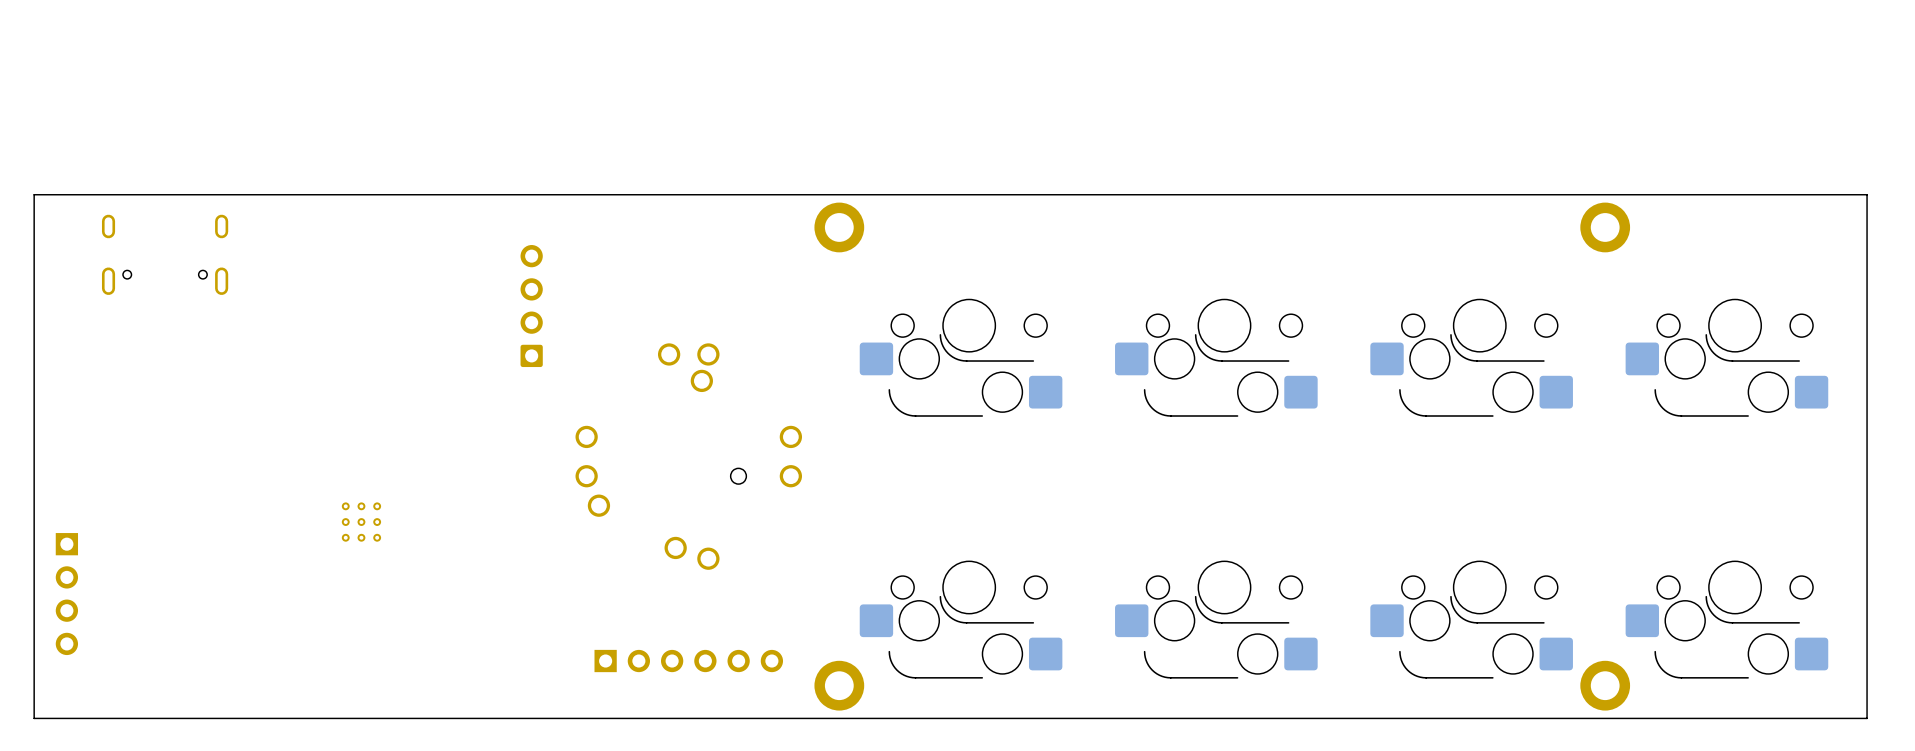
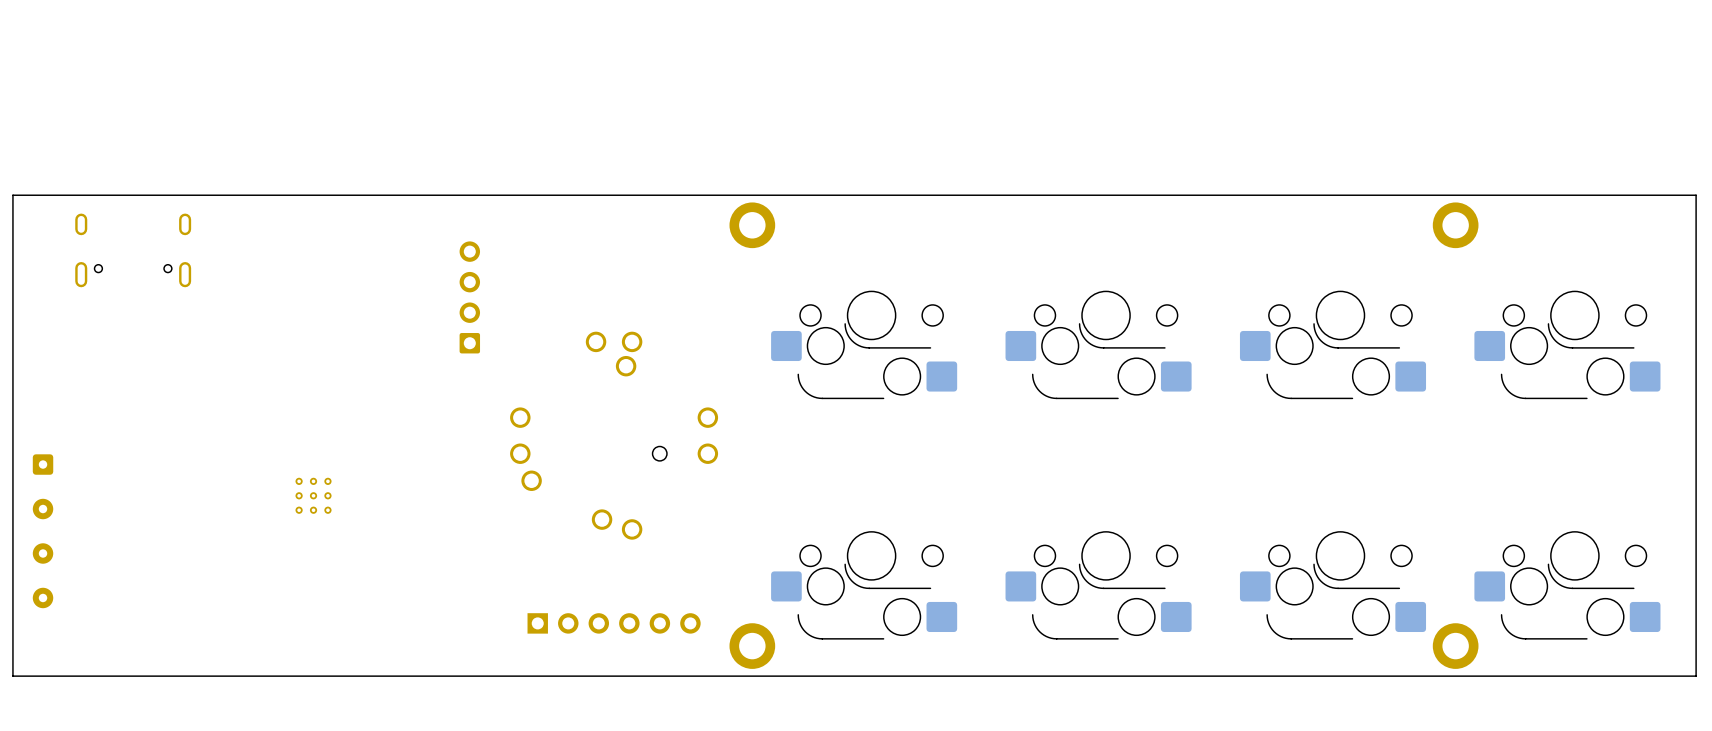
part: none -> (43, 531)
part: (66, 594) -> none

